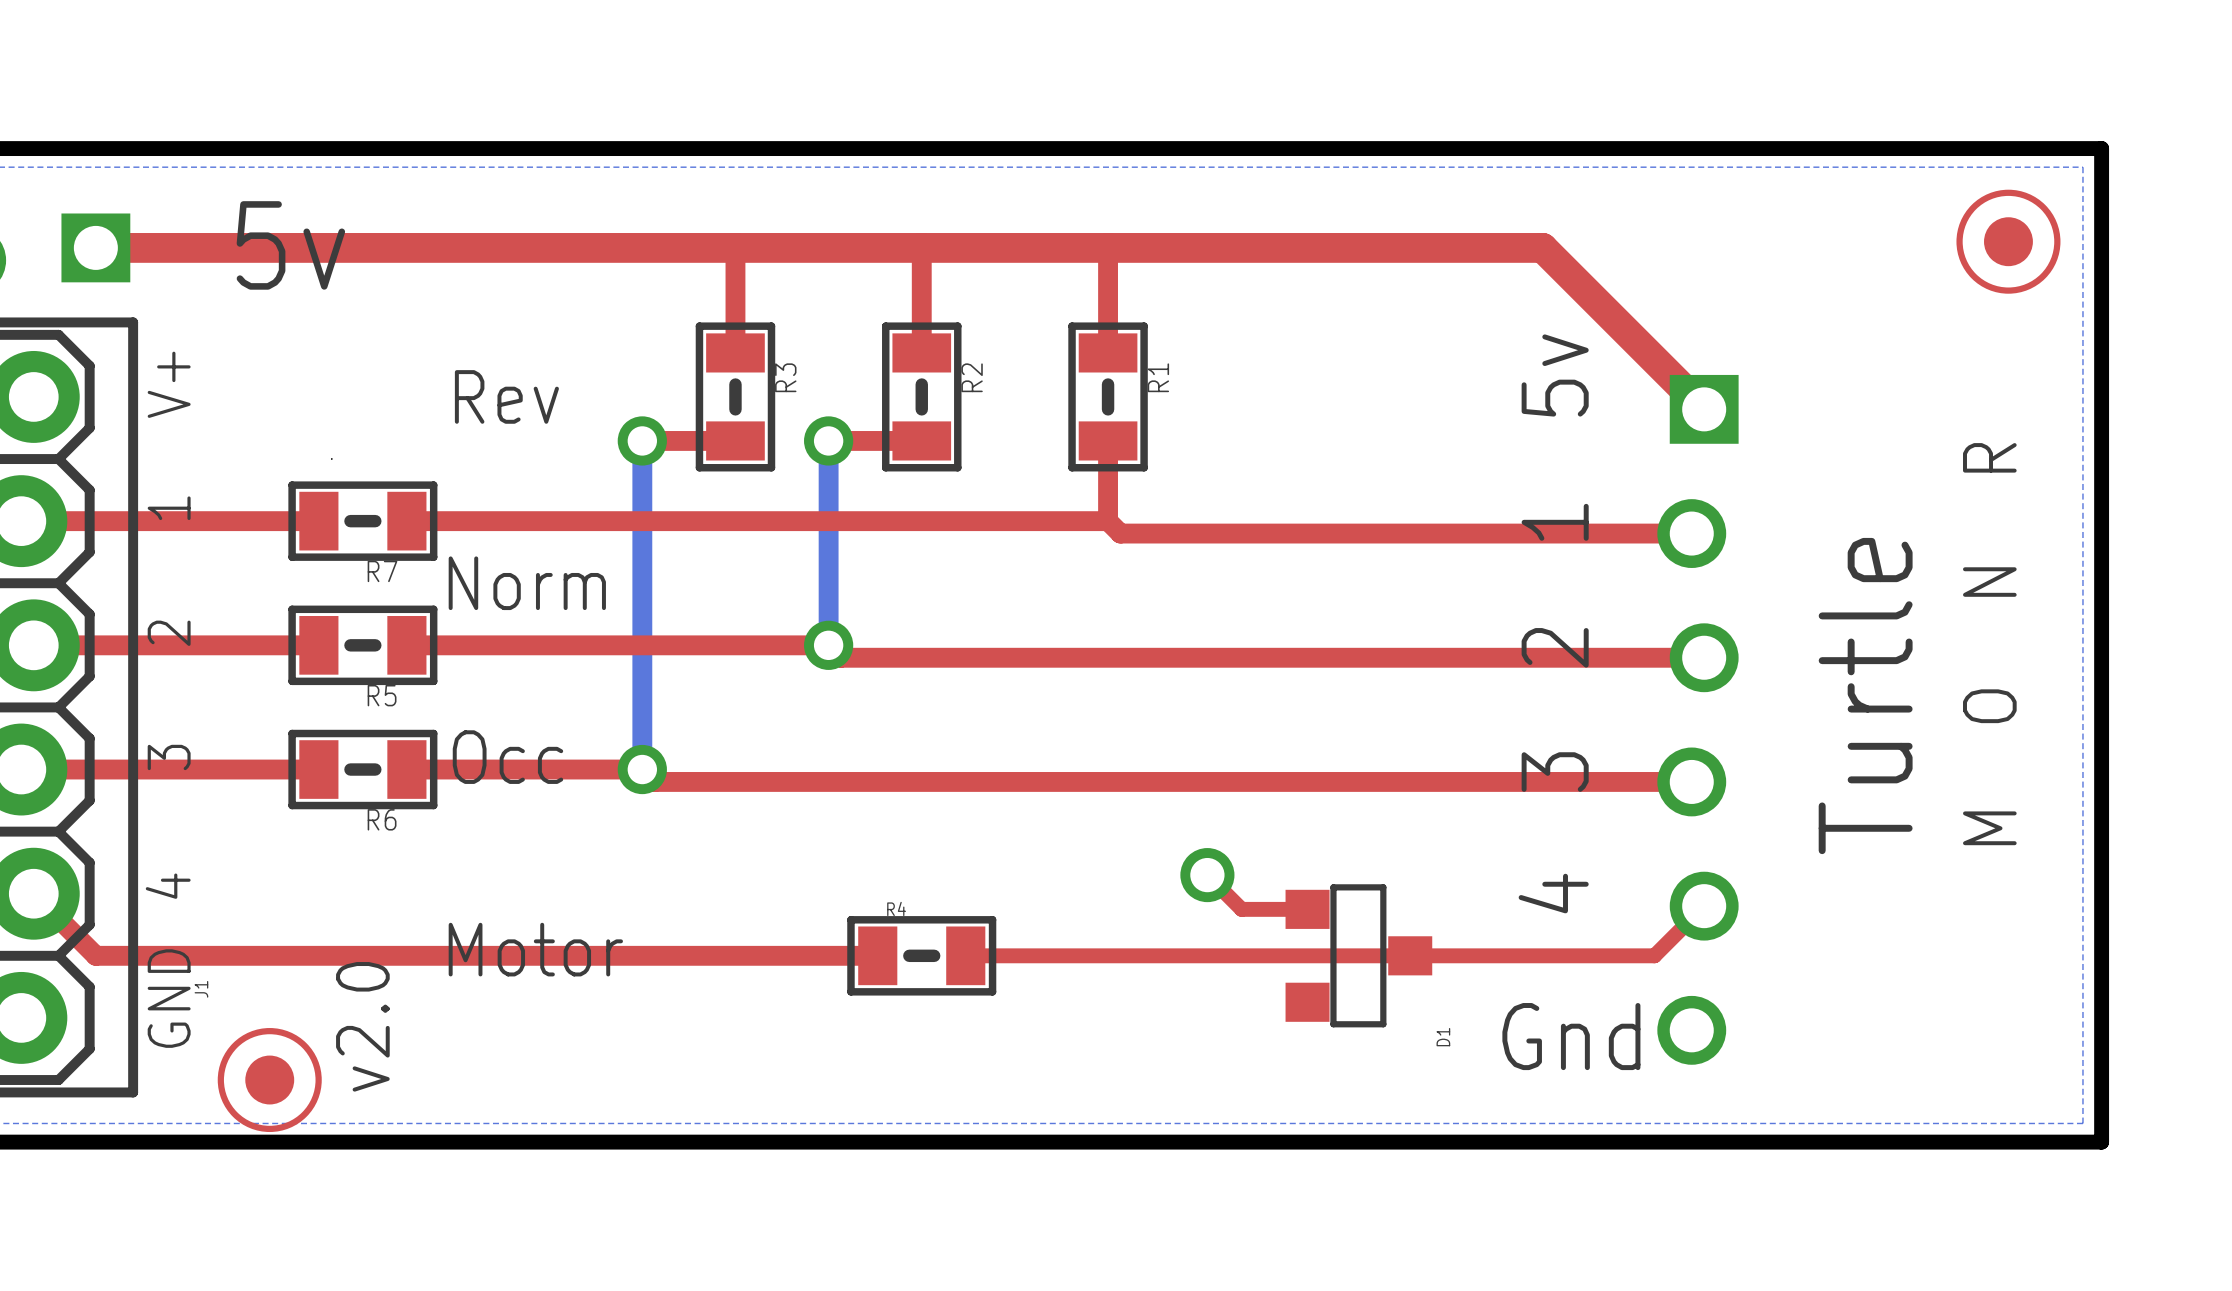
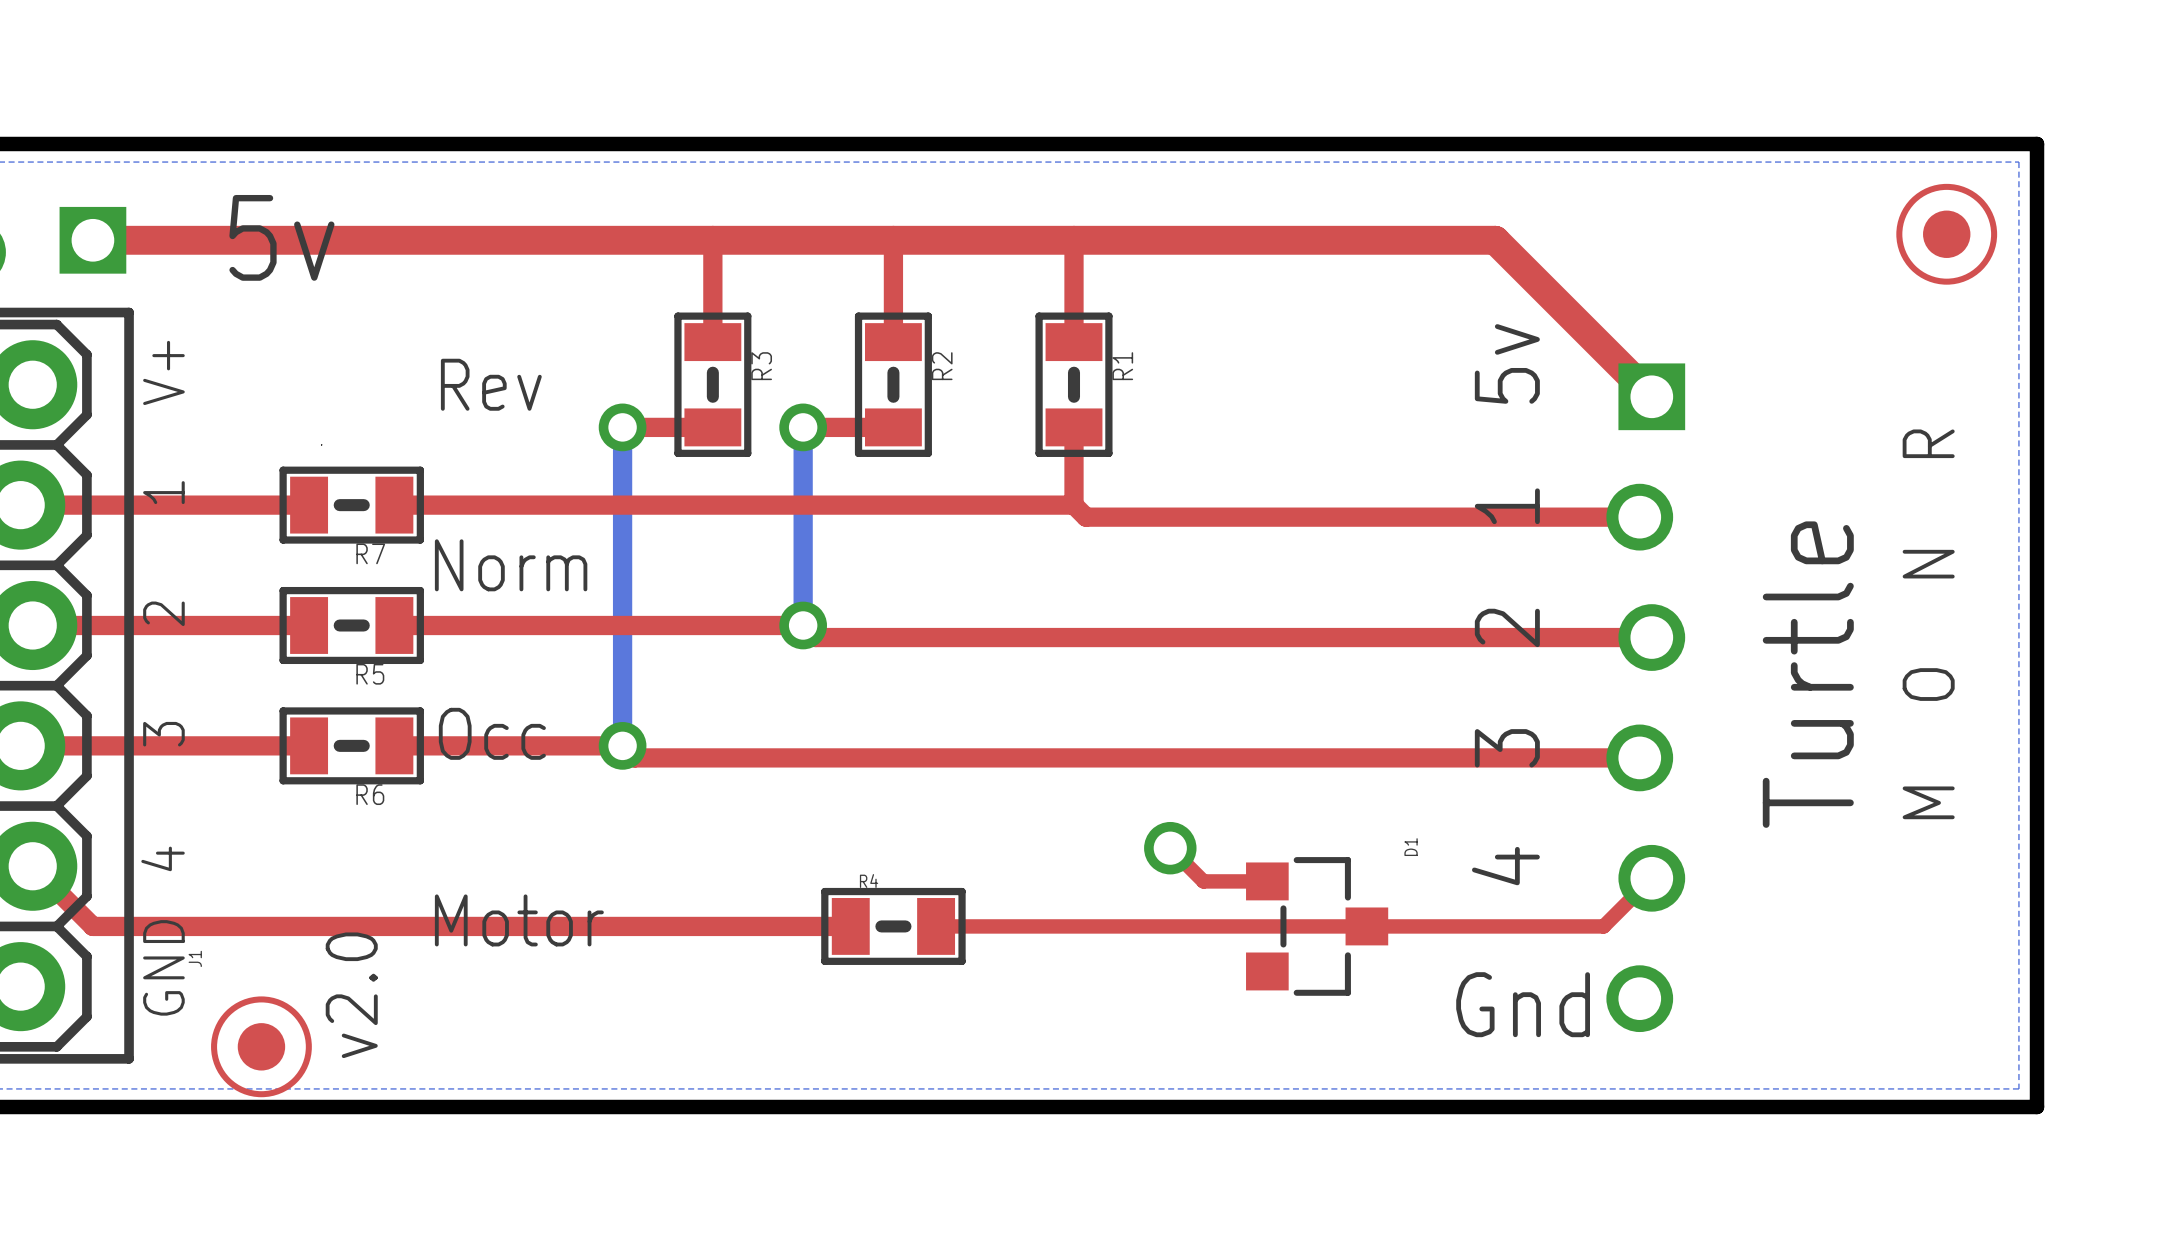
D1 footprint: [1285, 884, 1433, 1028] -> [1246, 857, 1389, 996]
D1 name position: D1 (1443, 1037) -> D1 (1411, 847)

